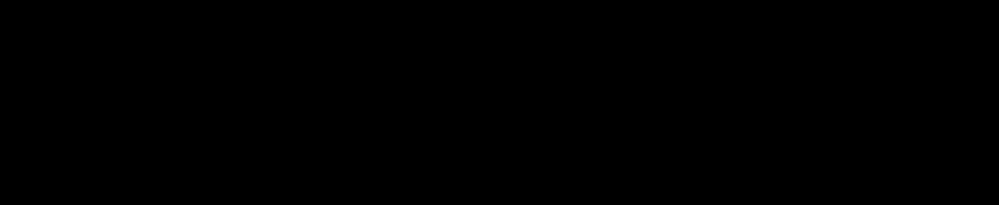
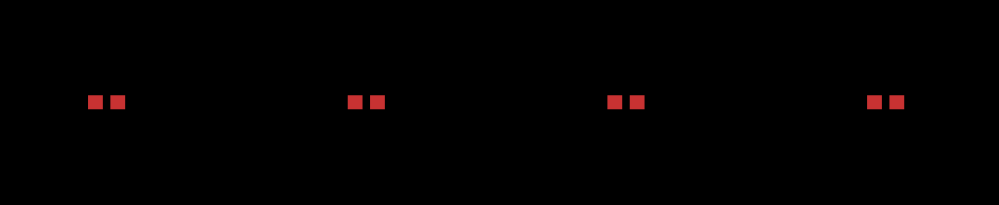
part: none -> (106, 102)
part: none -> (366, 102)
part: none -> (625, 102)
part: none -> (885, 102)

